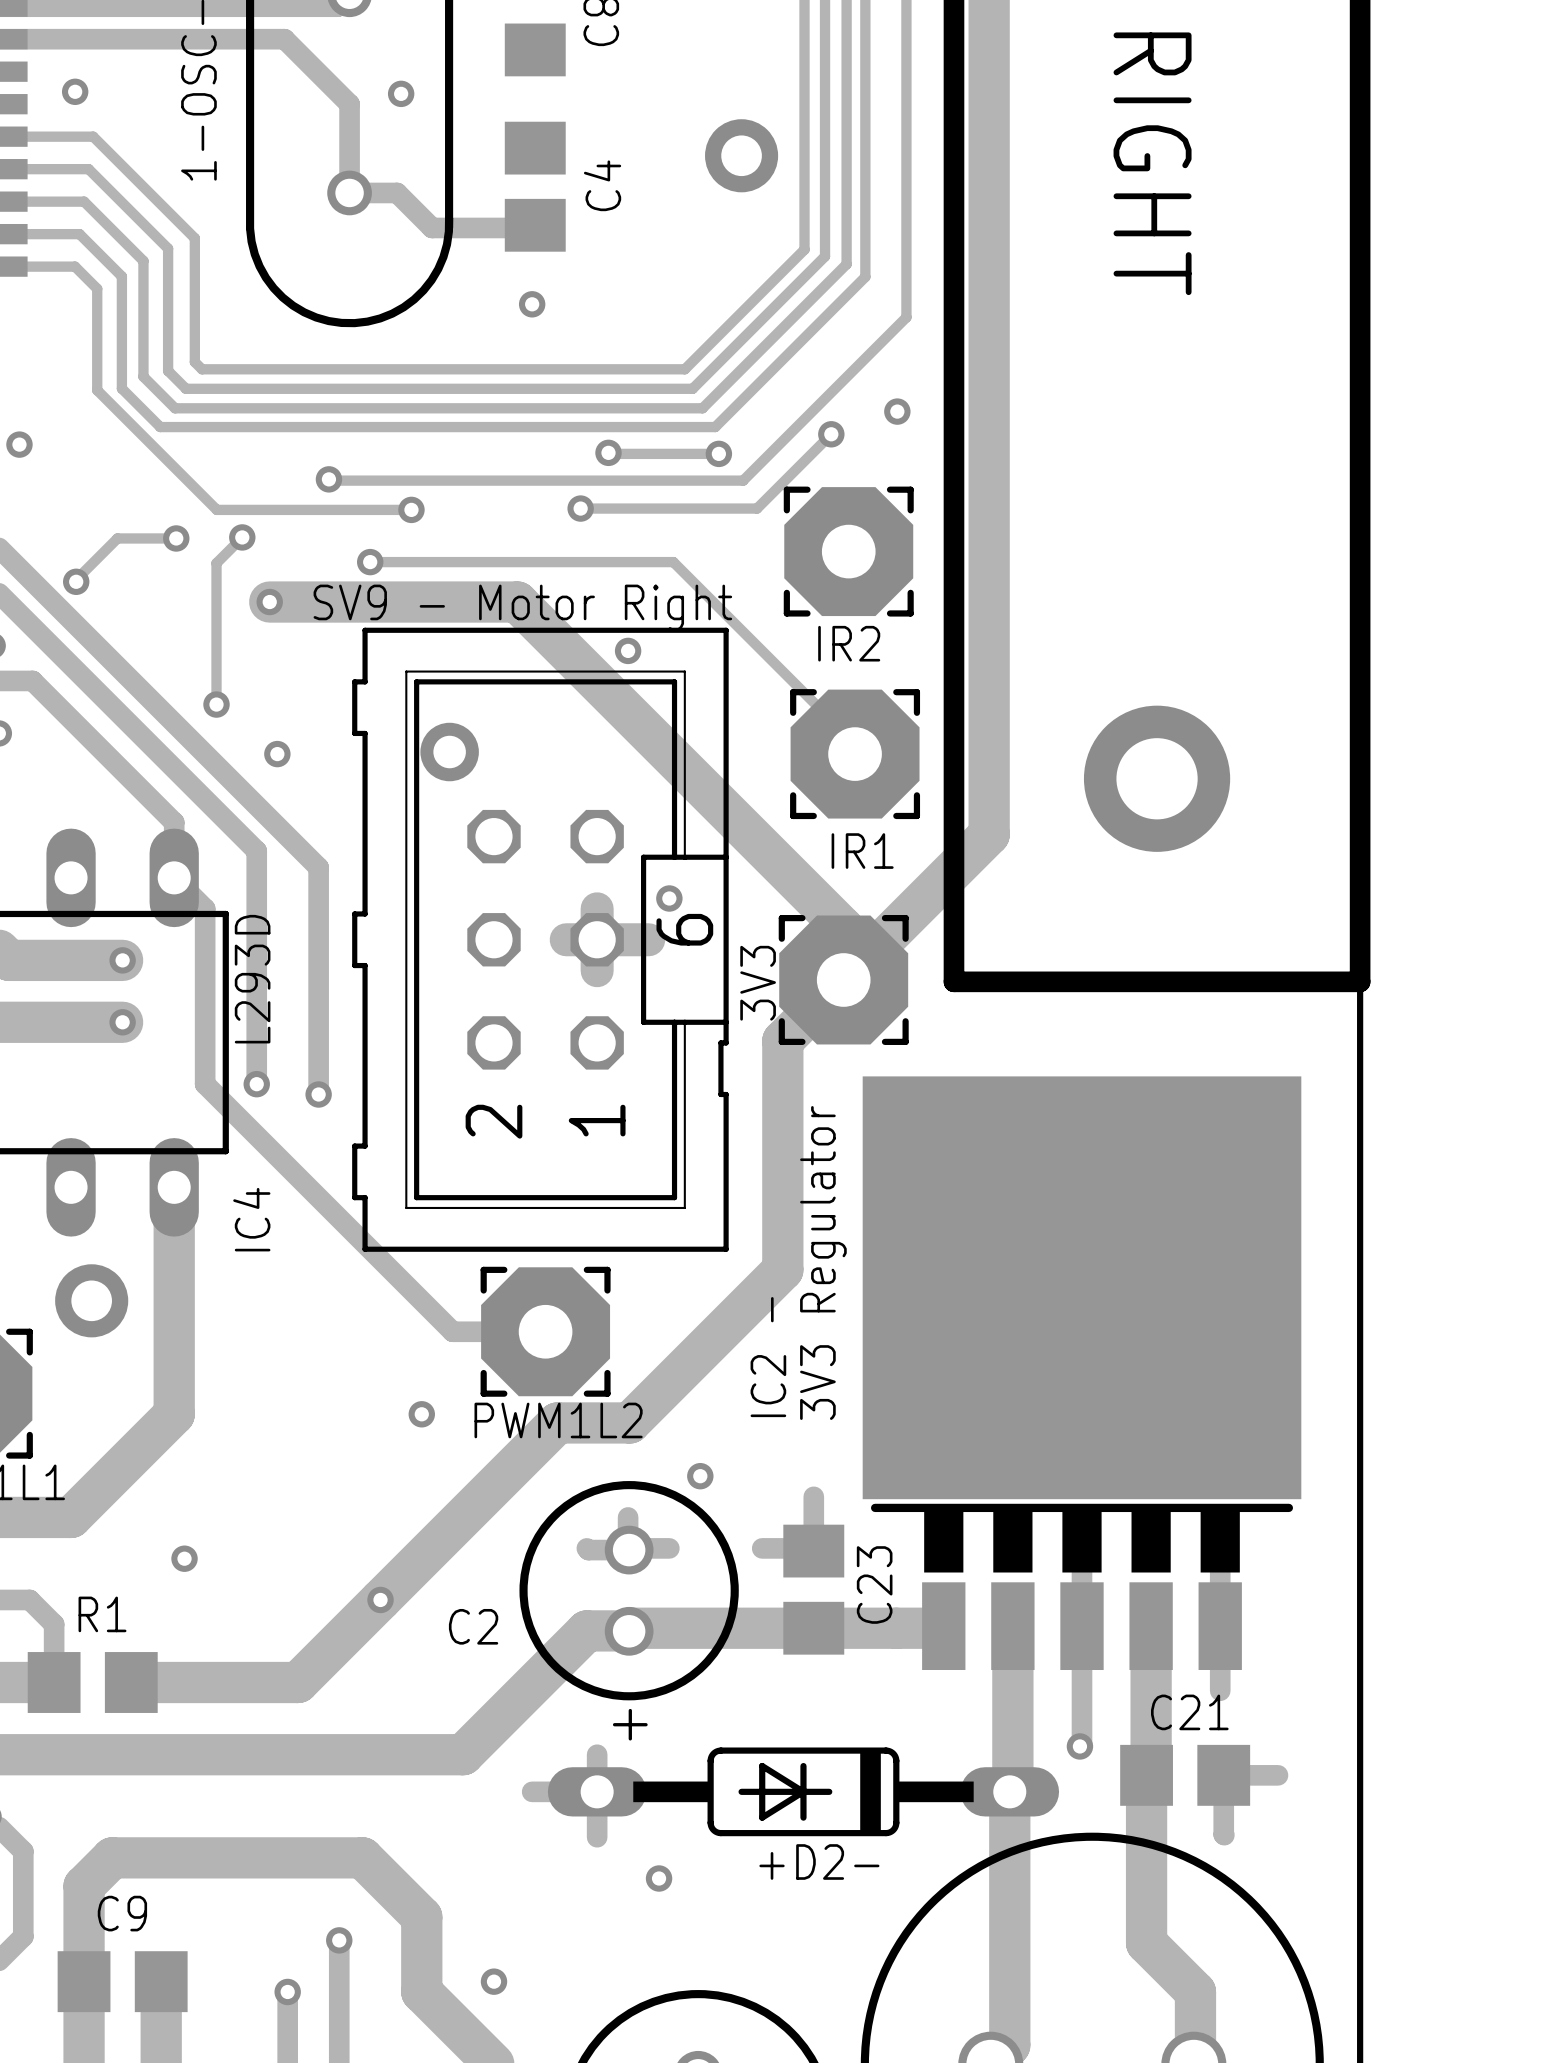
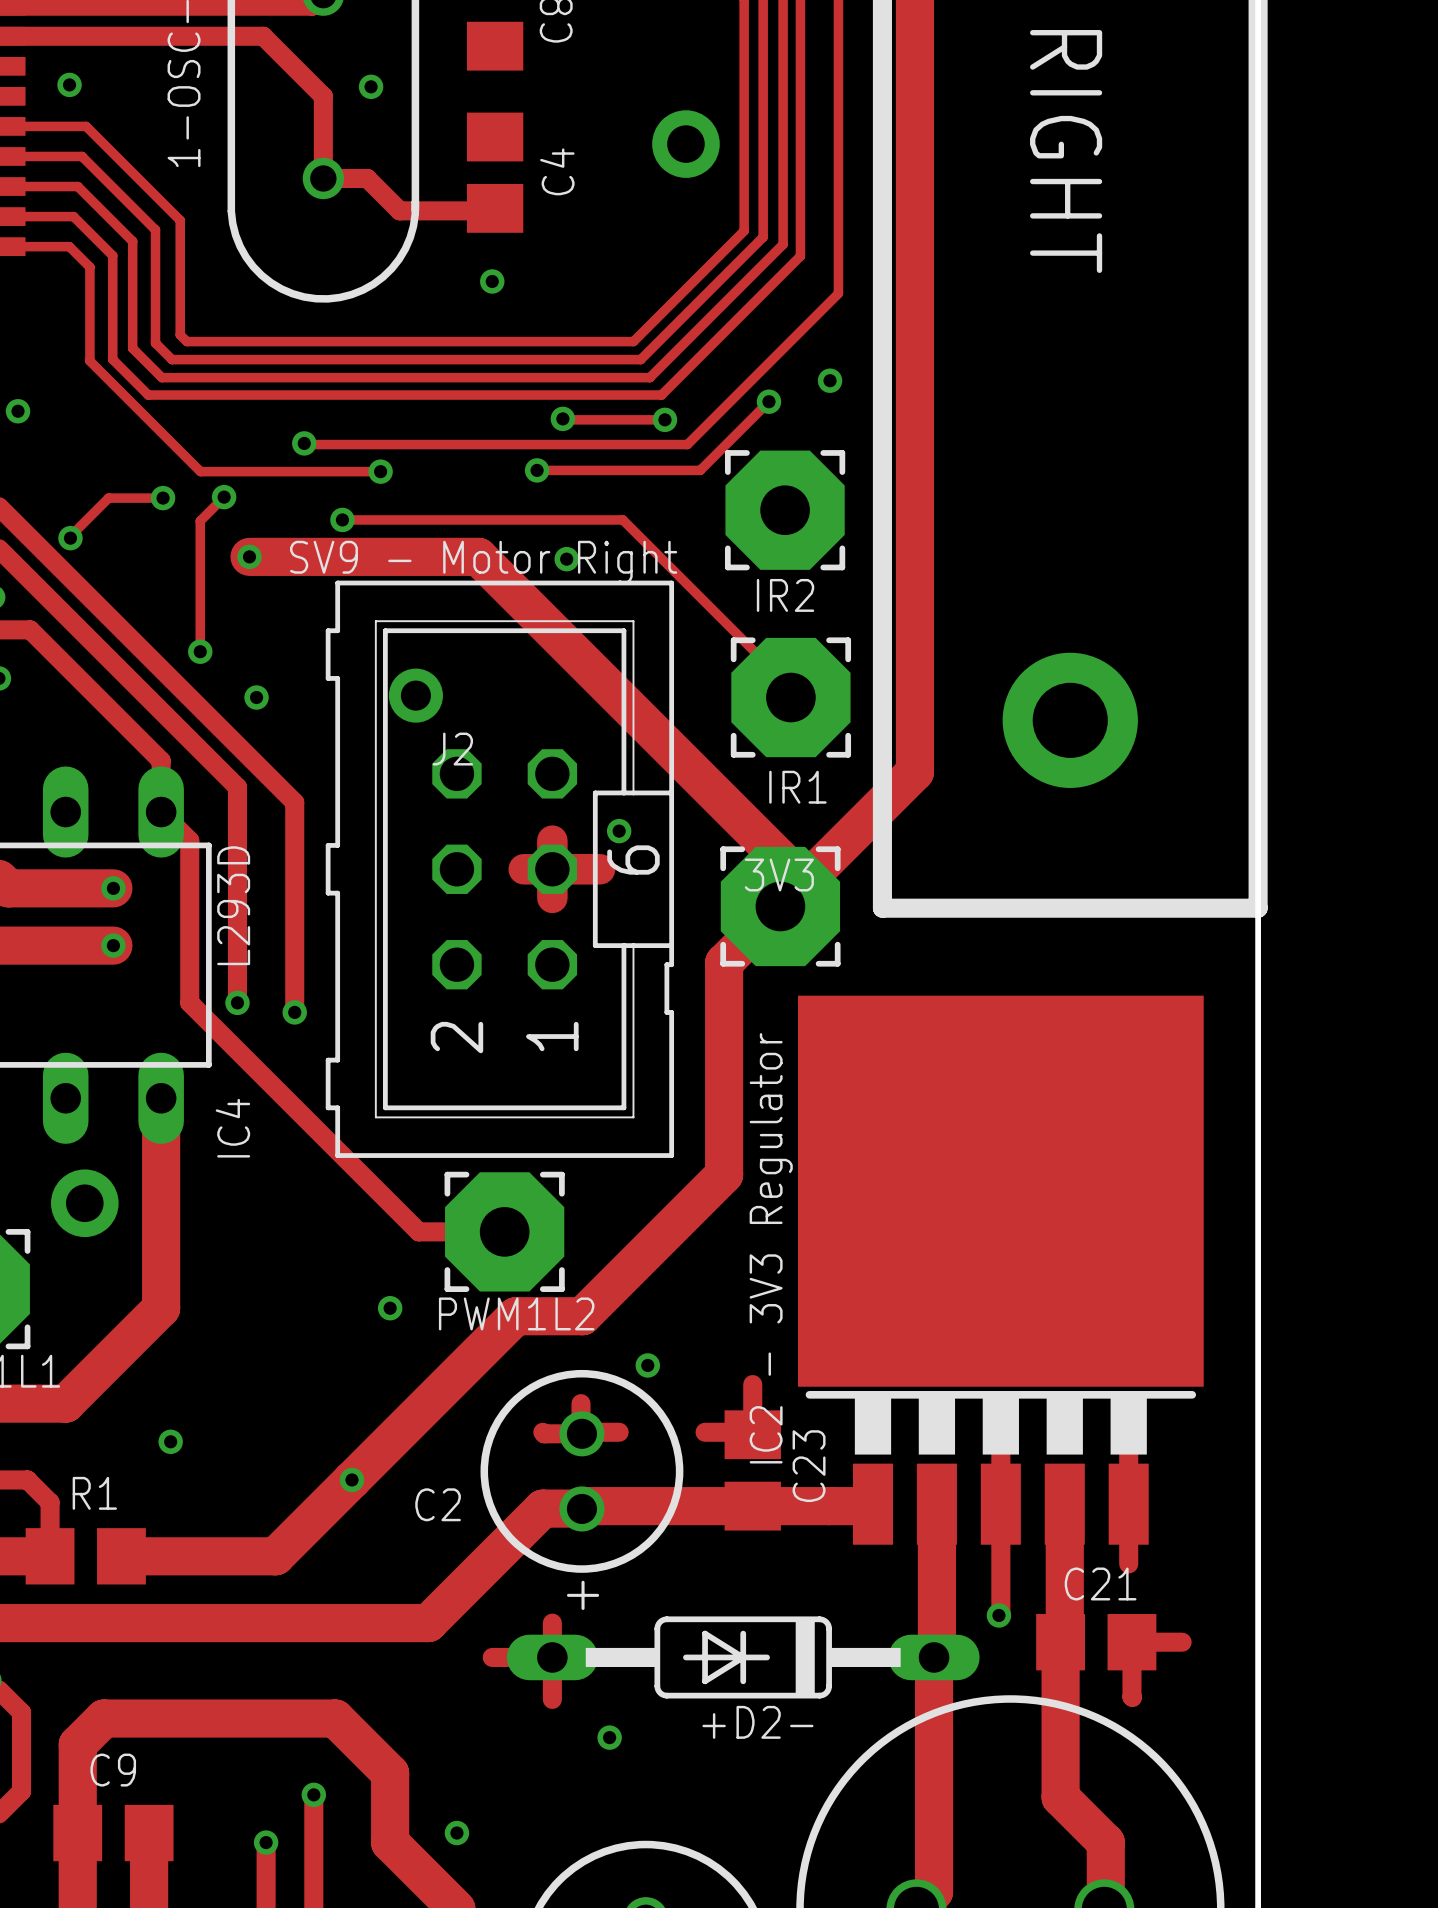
via position: (628, 650) -> (566, 559)
text: none -> J2 (452, 749)
text rotation: 0° (758, 983) -> 90° clockwise (779, 875)
text: 3V3 Regulator (823, 1263) -> IC2 - 3V3 Regulator (771, 1248)
text: IC2 - (768, 1357) -> none

